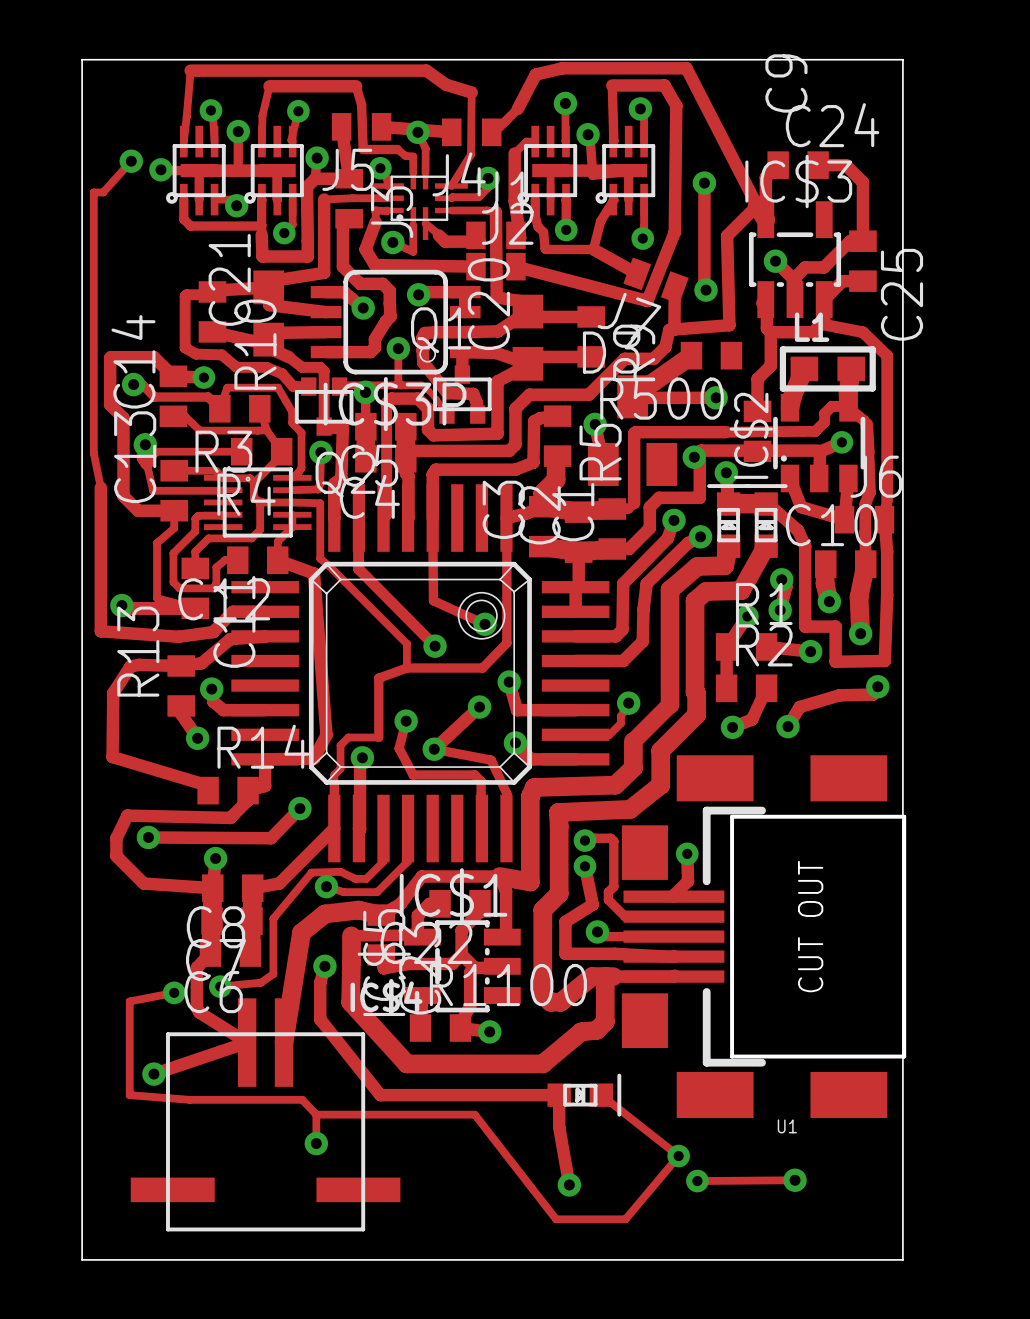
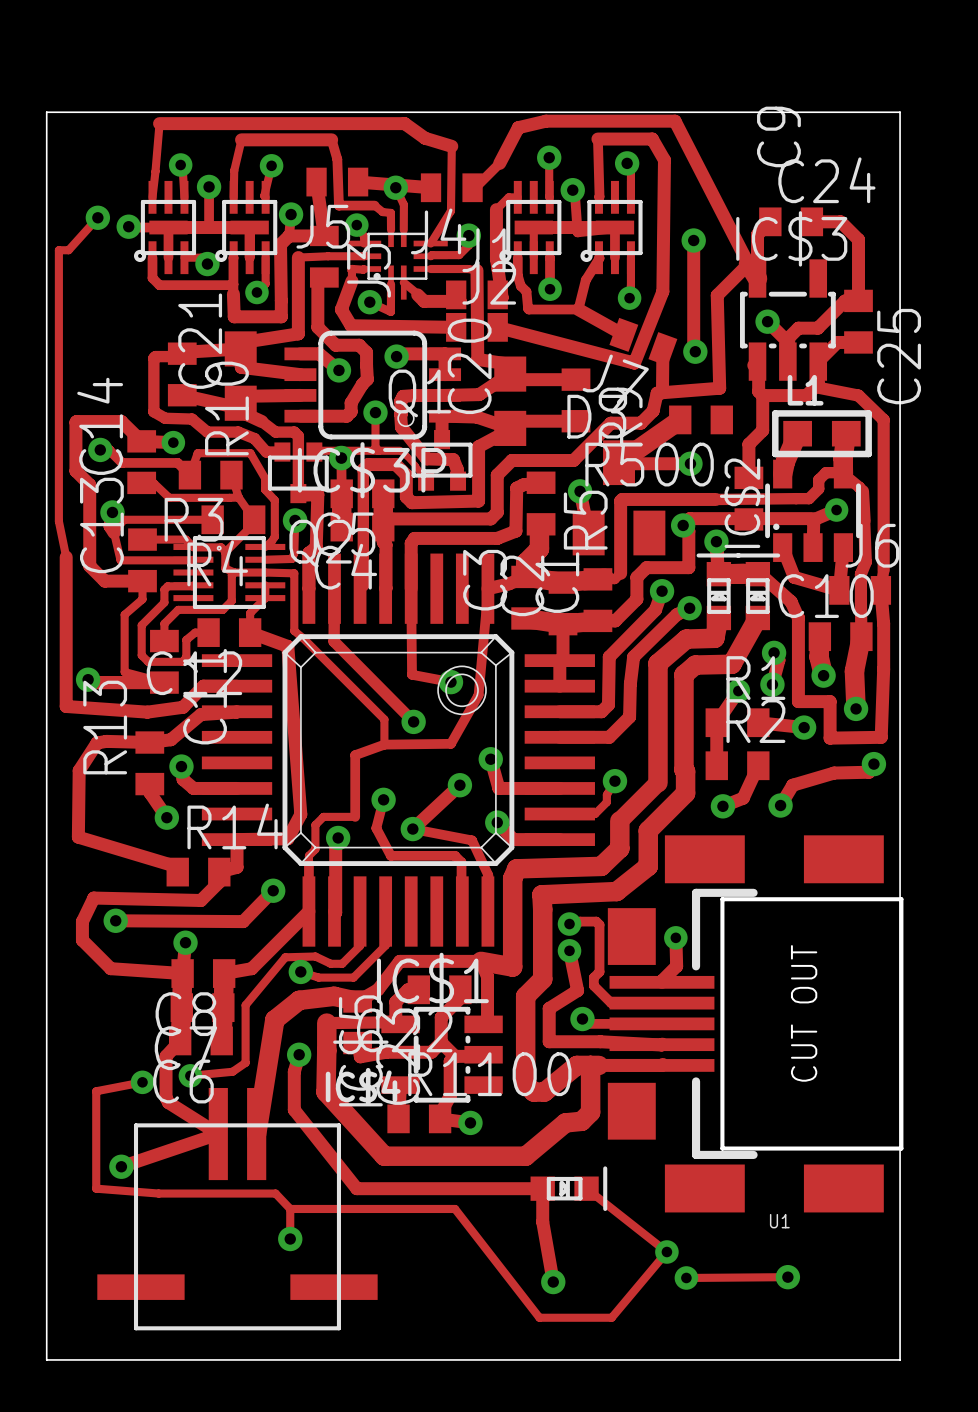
via position: (716, 397) -> (690, 463)
track: (506, 518) (506, 643) (482, 668) (406, 668) -> (488, 589) (478, 695) (450, 743) (384, 744)
track: (433, 600) (485, 624) -> (412, 674) (450, 682)
via position: (485, 624) -> (450, 682)

